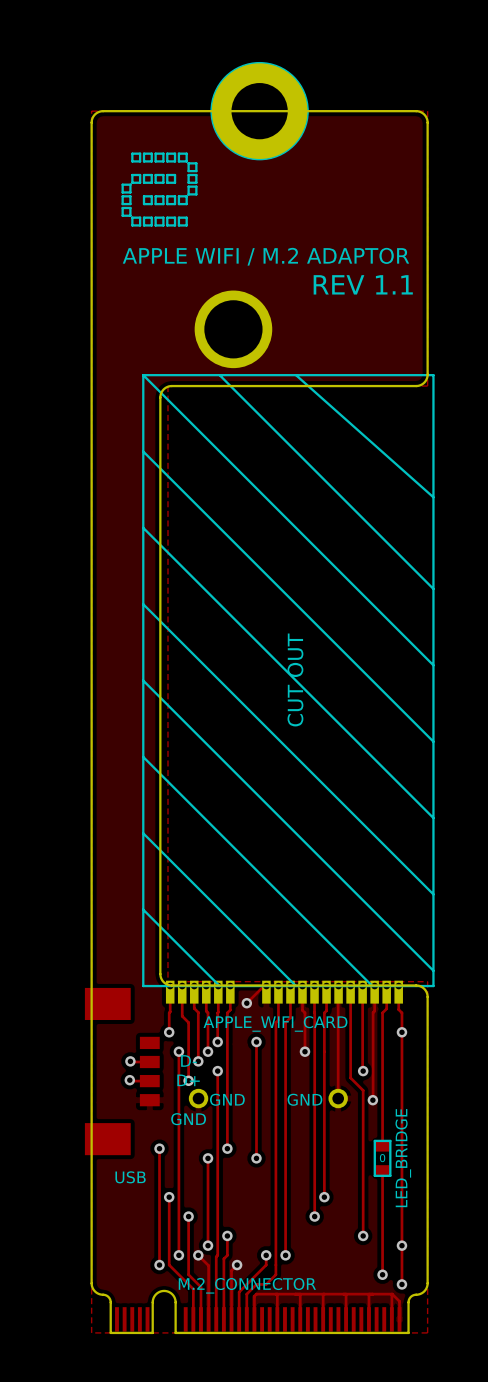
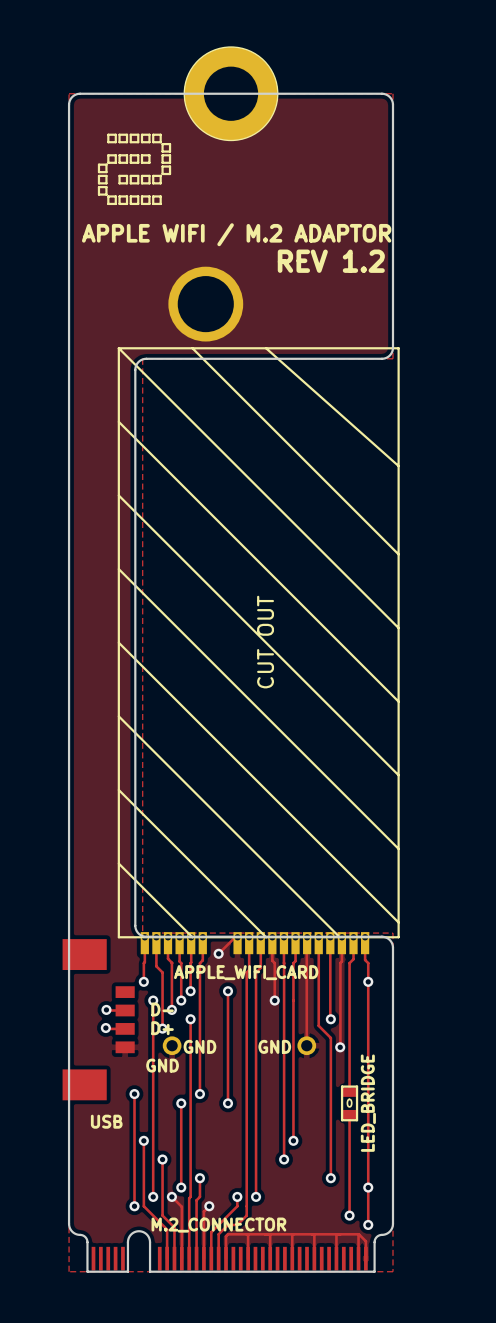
text: REV 1.1 (363, 284) -> REV 1.2 (331, 261)

